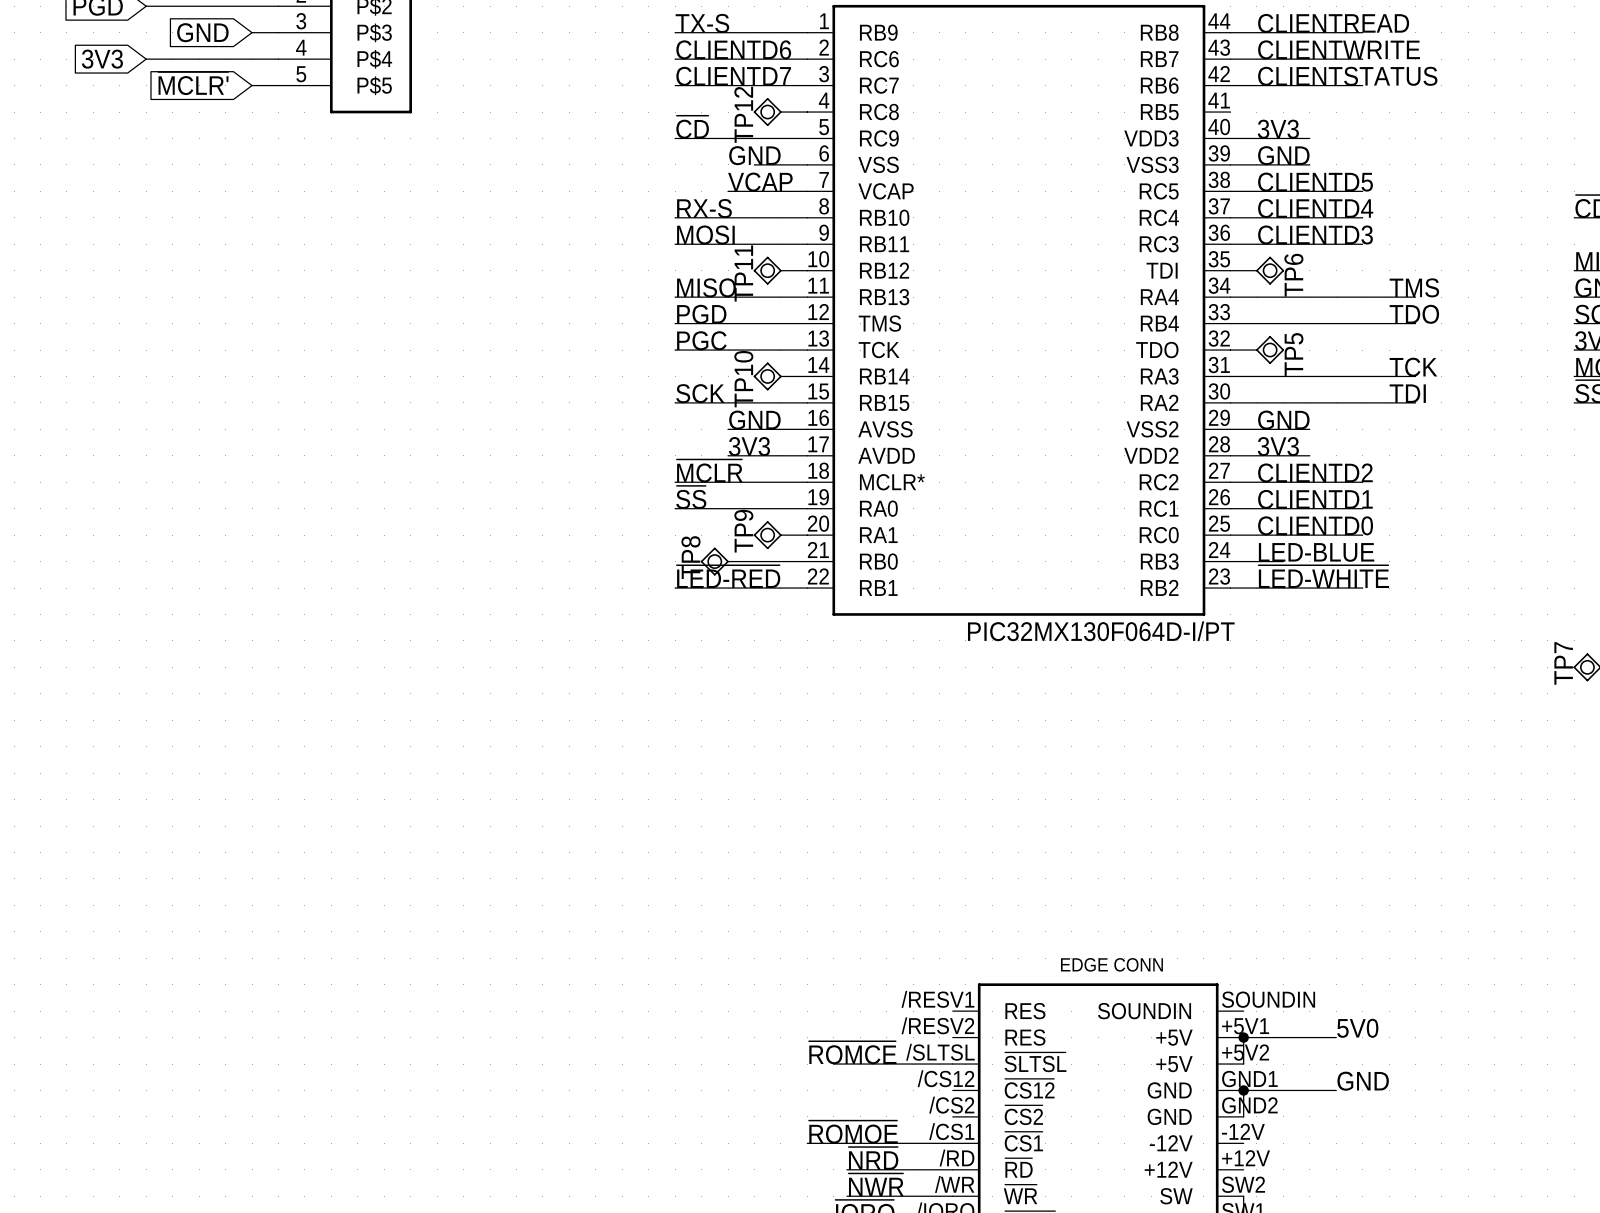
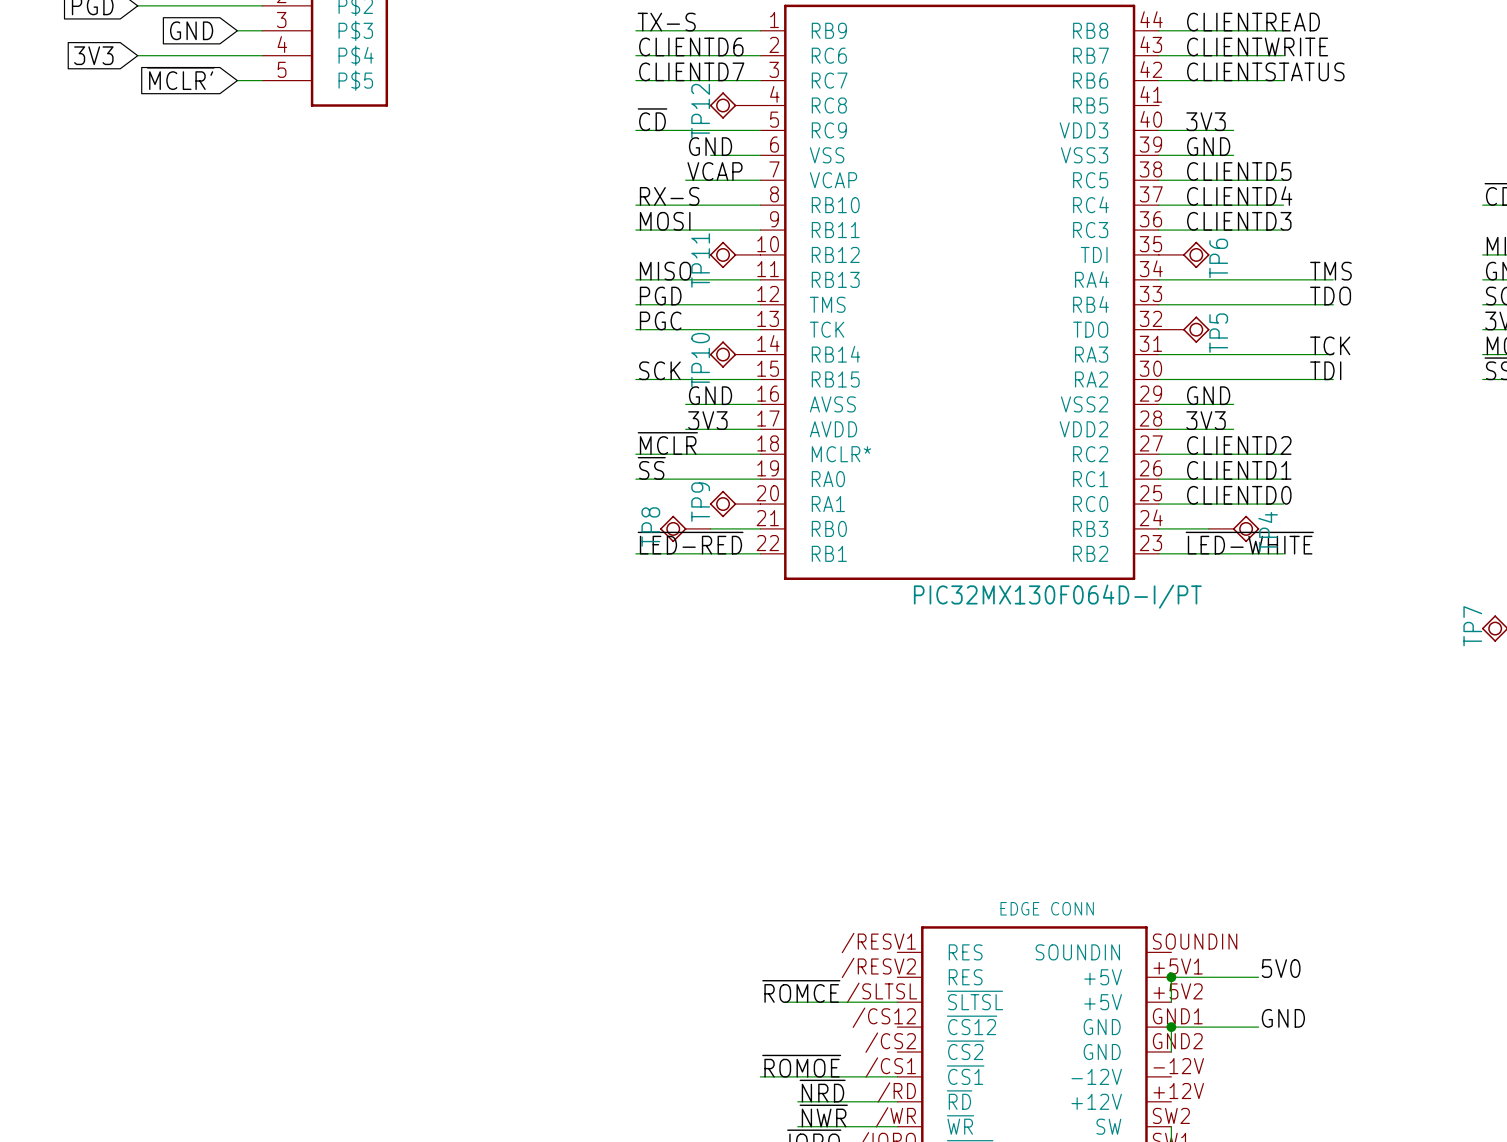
label: LED-BLUE (1316, 552) -> none
TP4: none -> (1234, 528)

